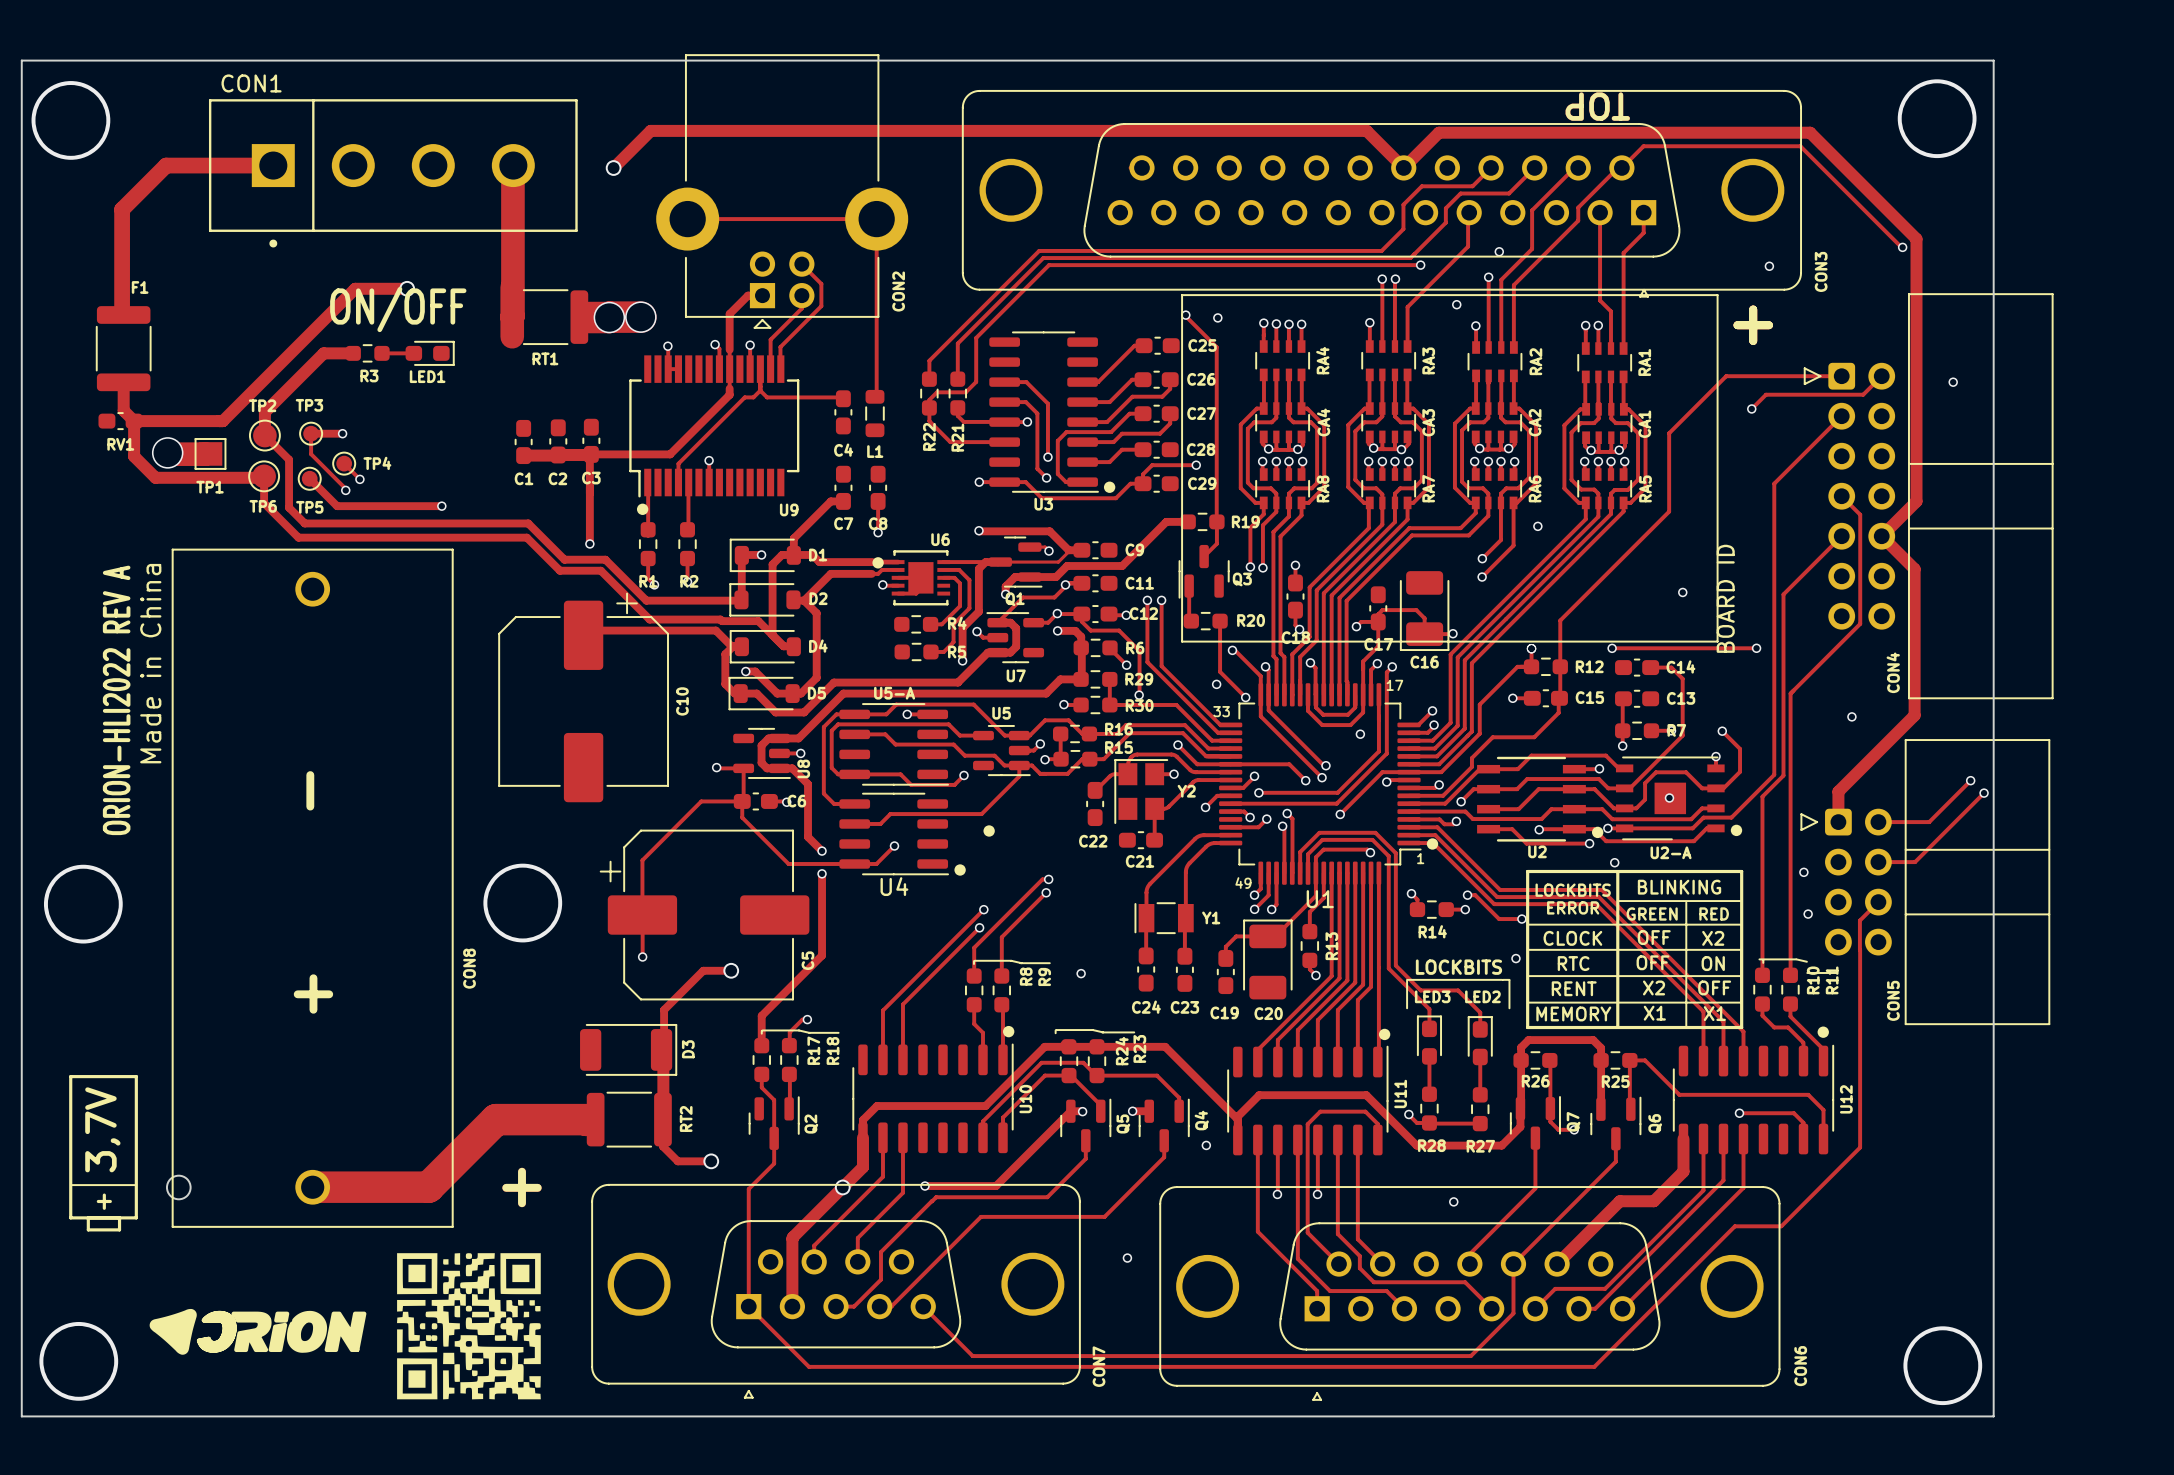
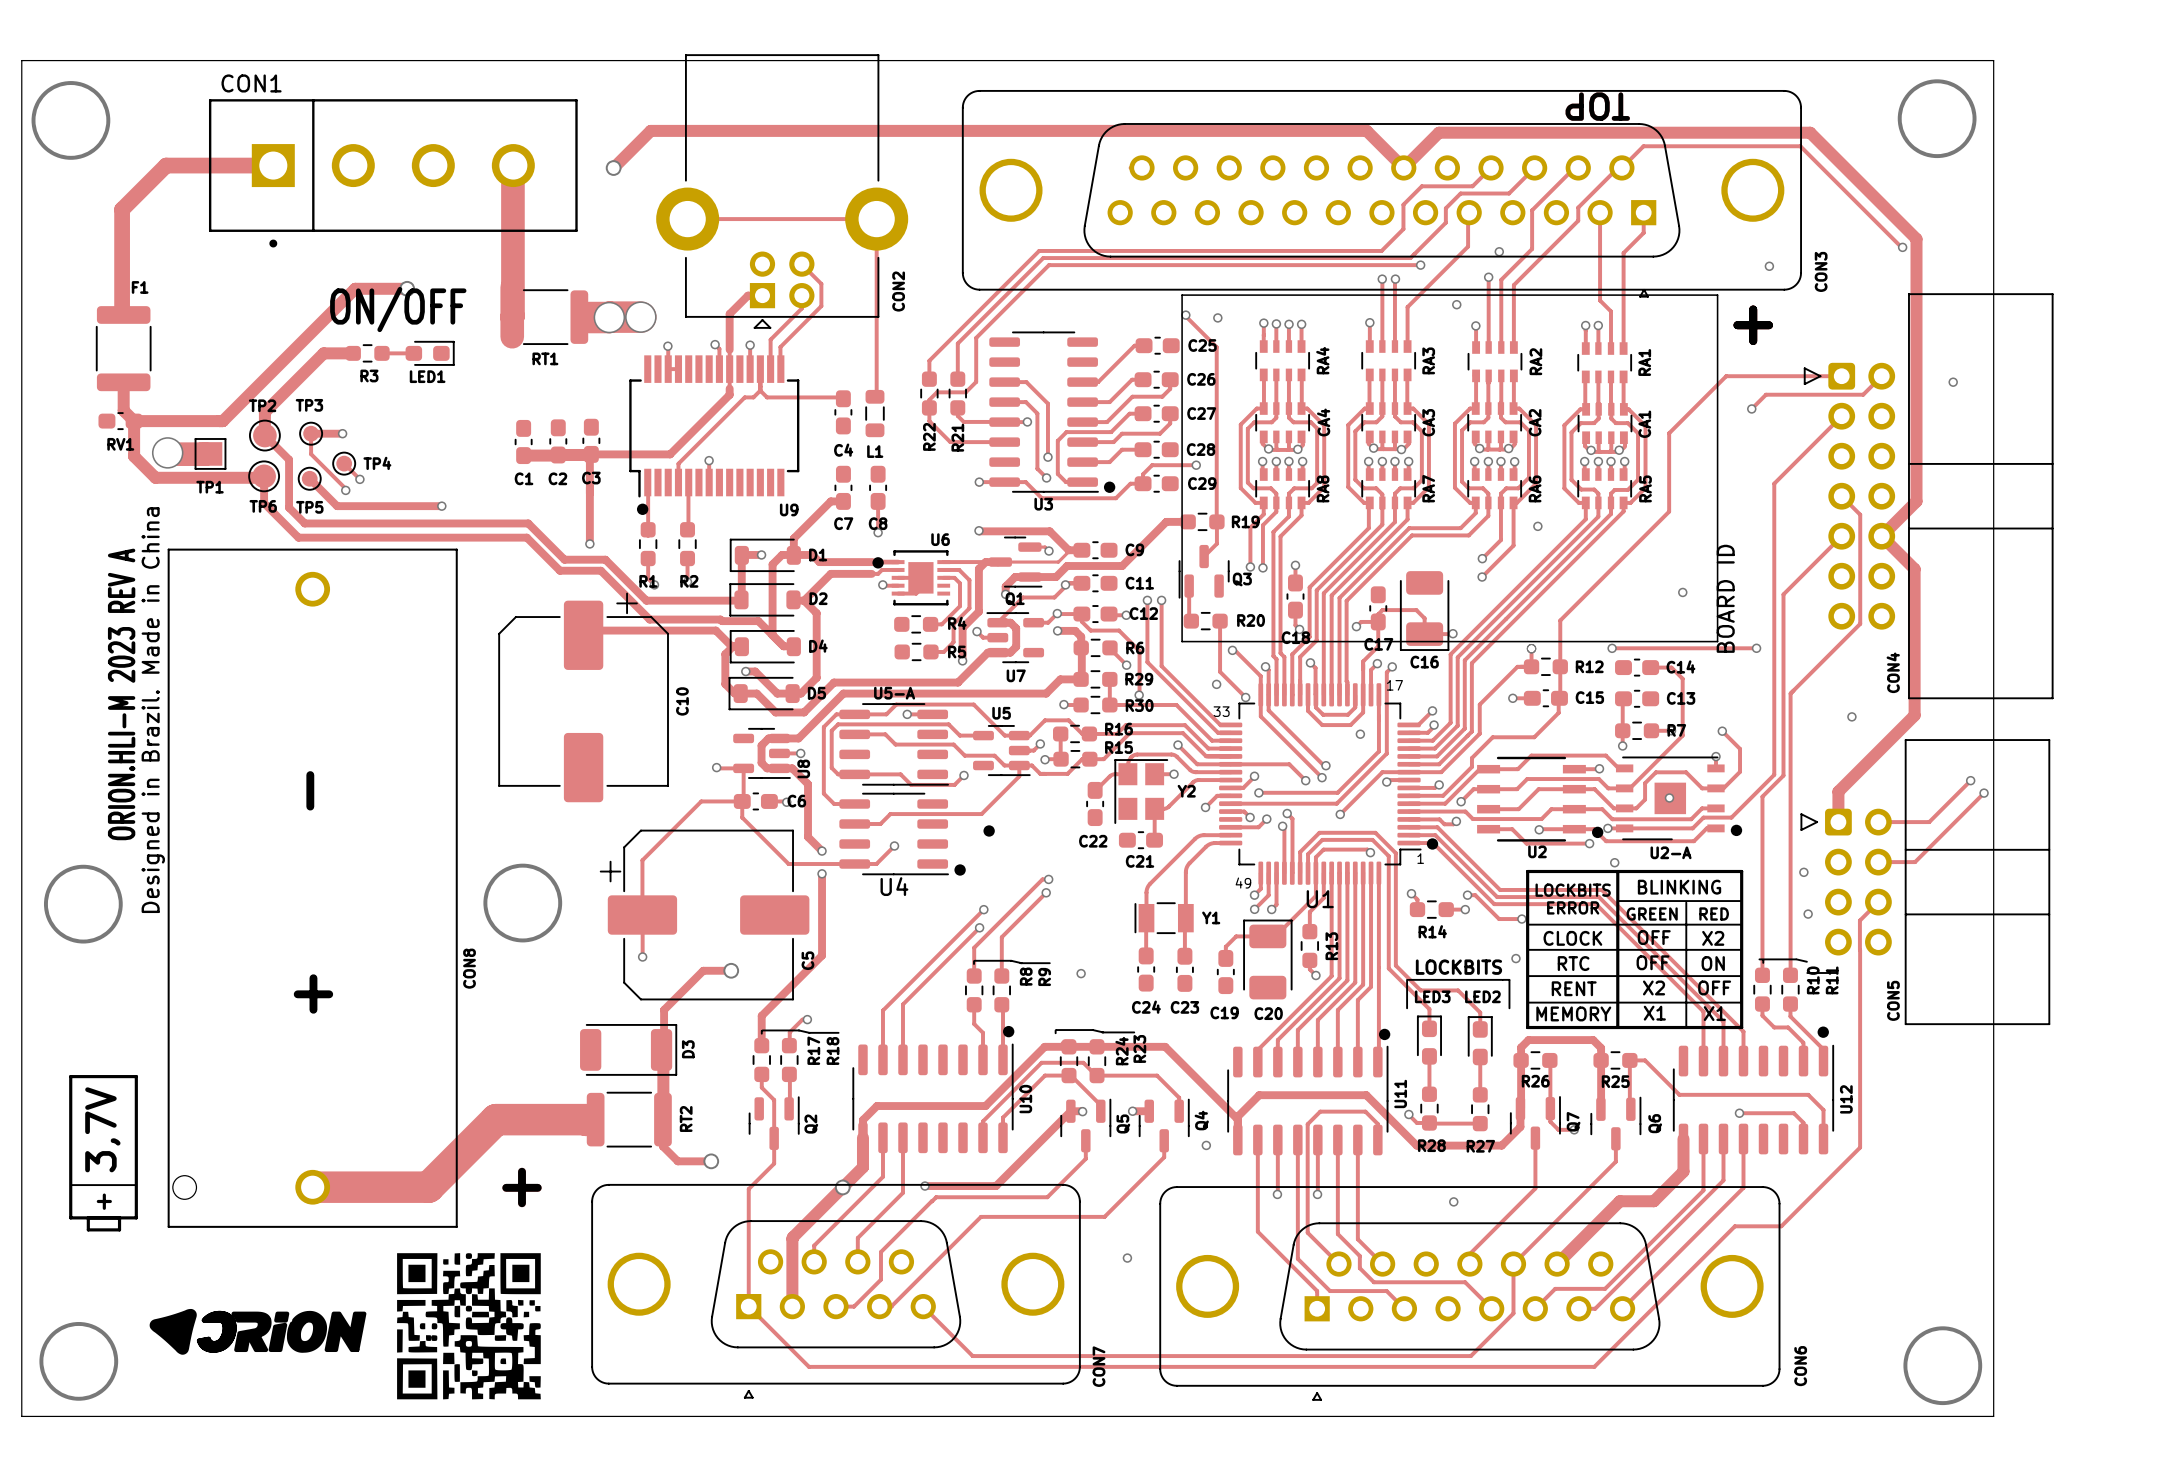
CON8 footprint: [166, 548, 454, 1228] -> [167, 548, 458, 1228]
text: Made in China (150, 663) -> none
text: ORION-HLI2022 REV A (116, 700) -> ORION.HLI-M 2023 REV A (121, 694)
text: none -> Designed in Brazil. Made in China (153, 710)

